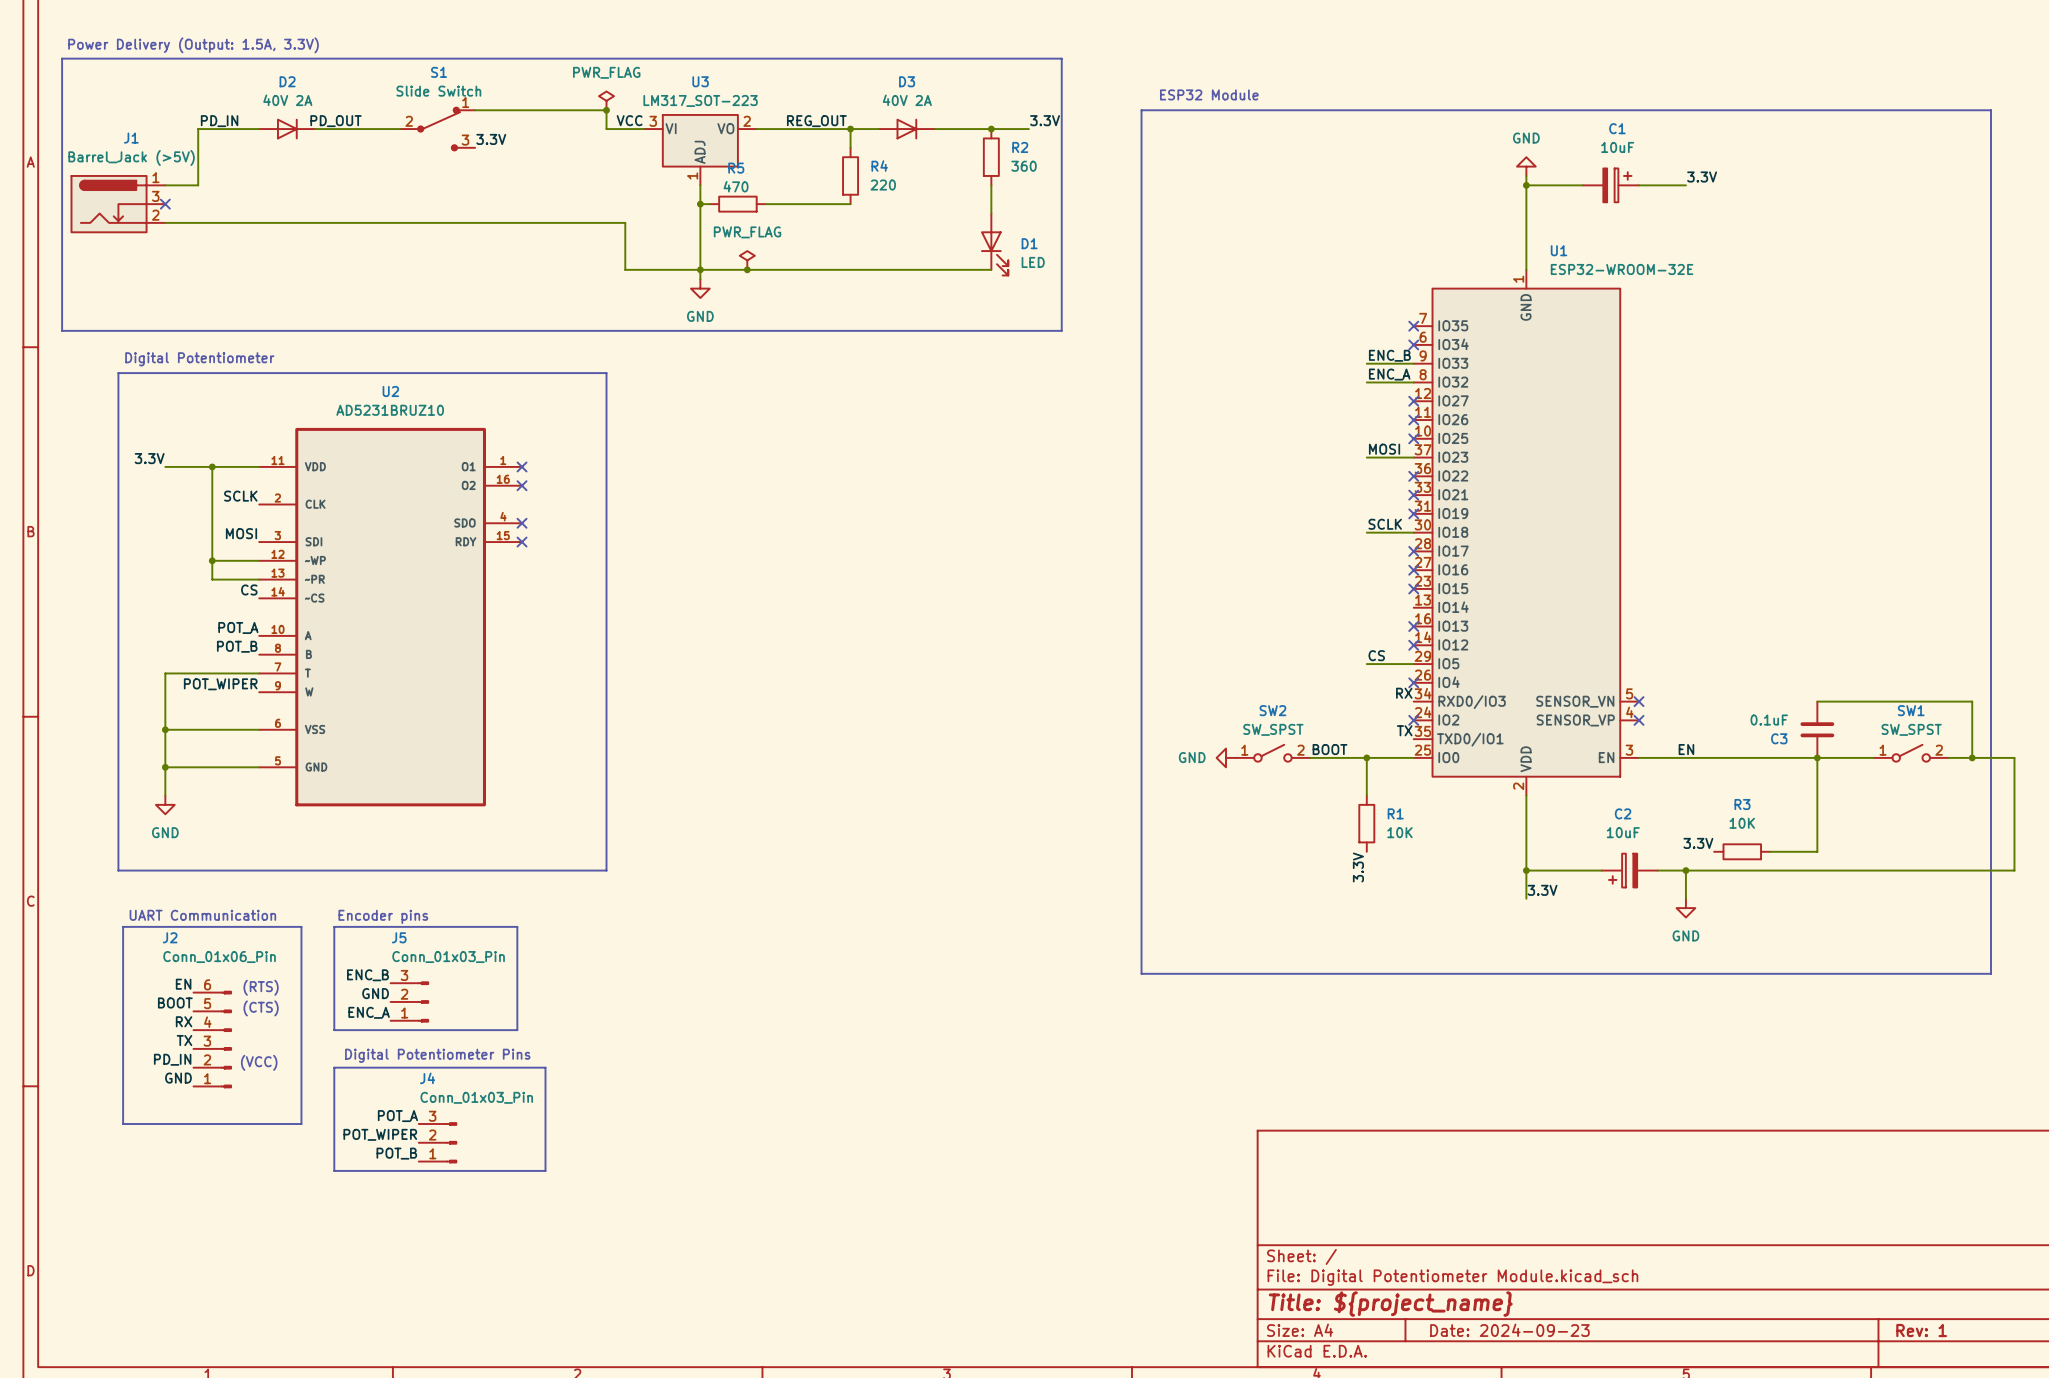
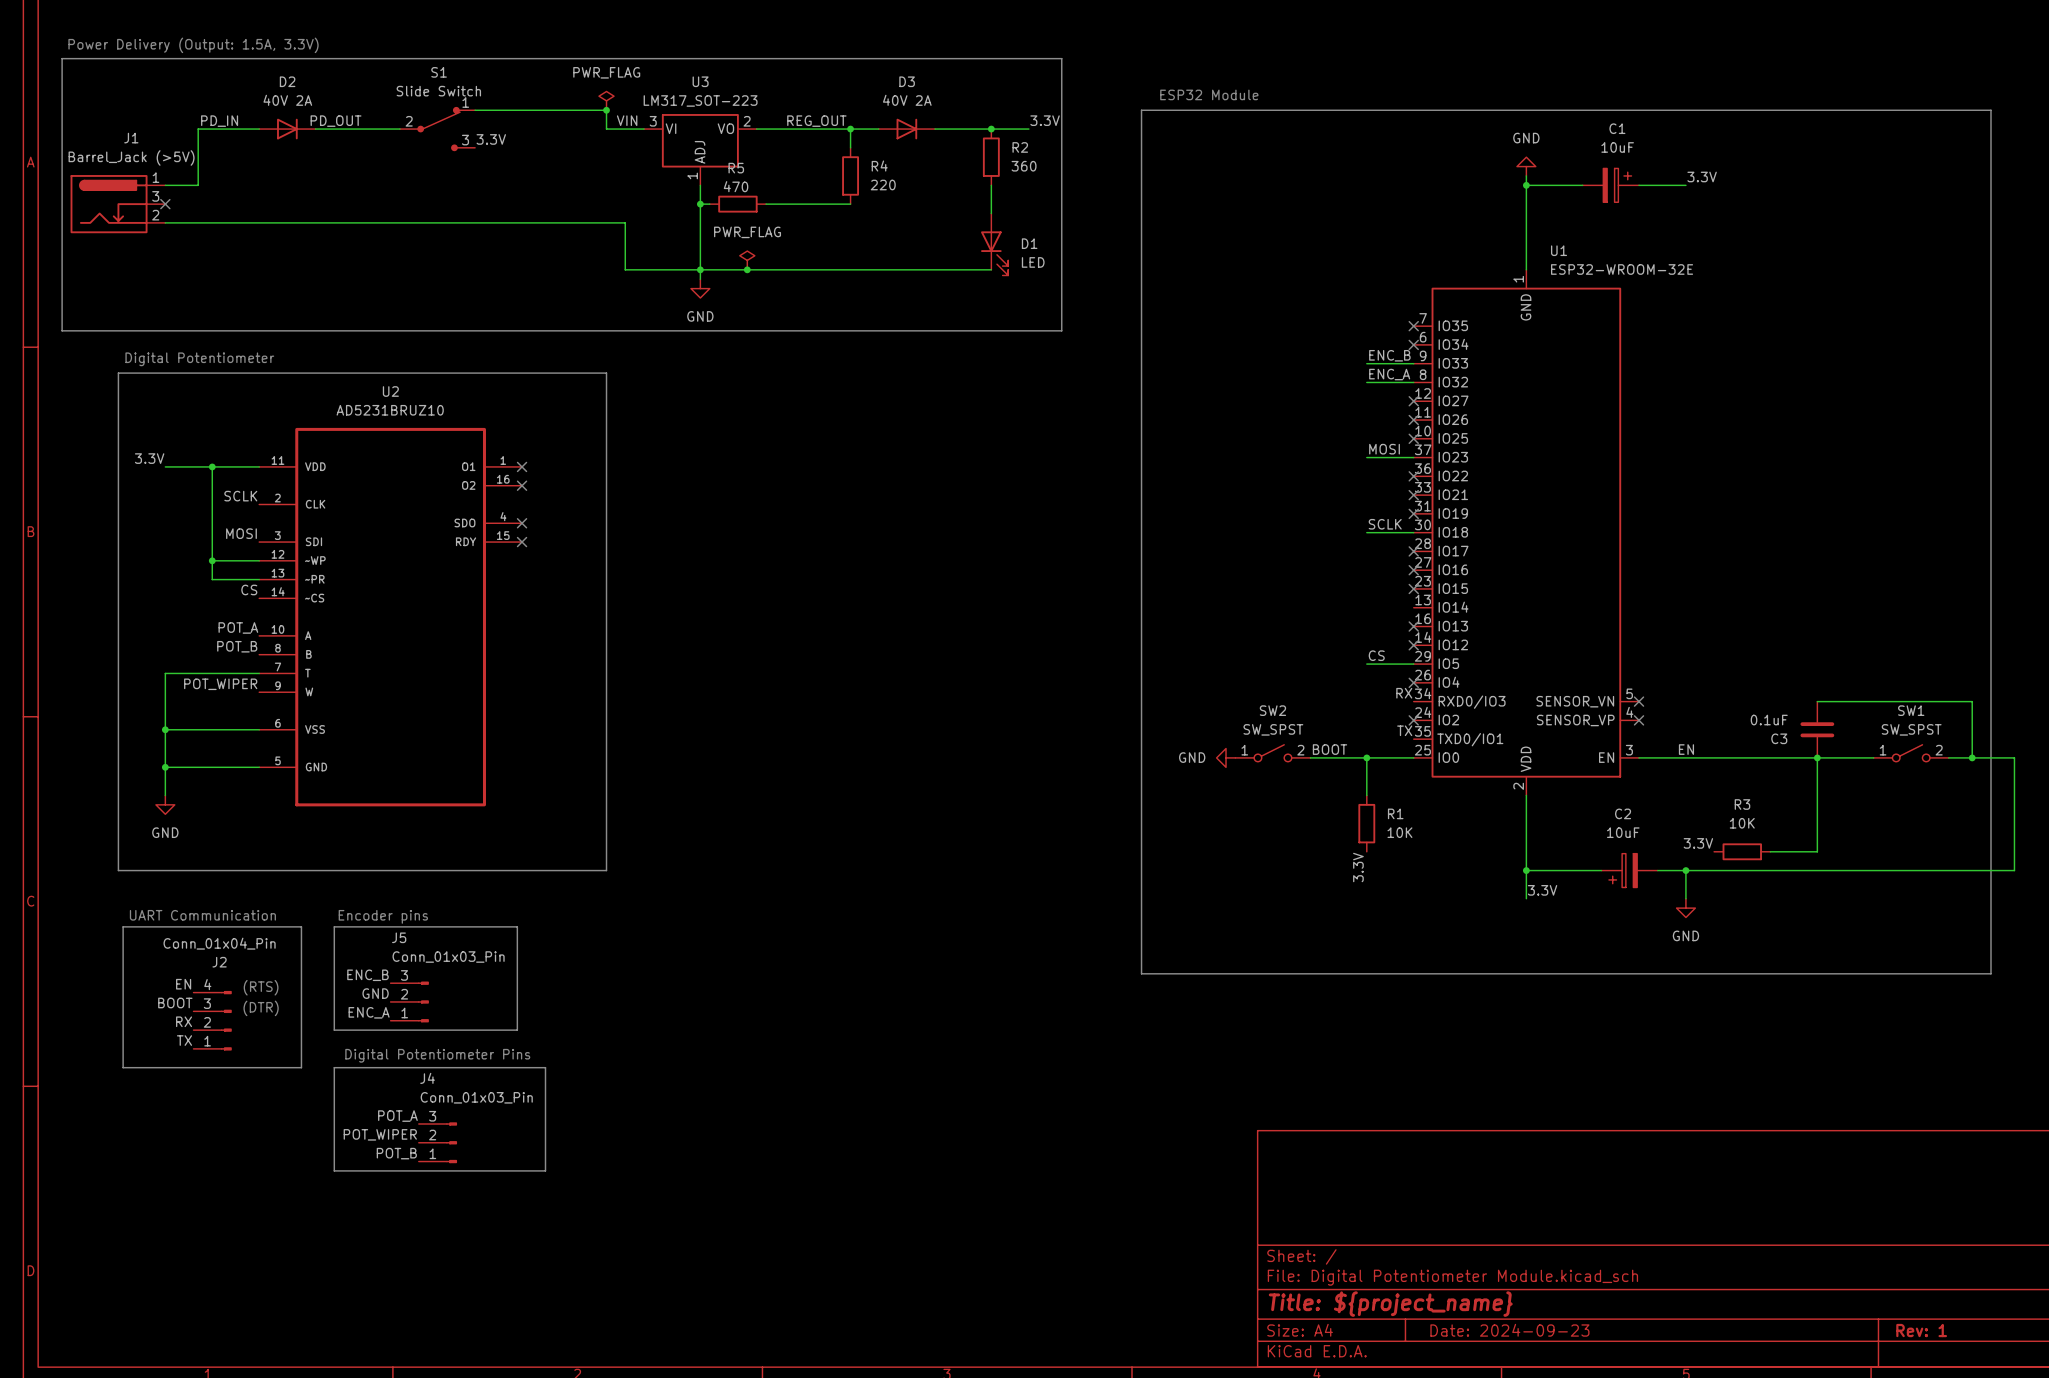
label: VCC (629, 120) -> VIN (627, 120)
J2 name position: J2 (170, 937) -> J2 (219, 962)
J2 value: Conn_01x06_Pin (219, 957) -> Conn_01x04_Pin (219, 943)
J2 symbol: [193, 991, 232, 1088] -> [193, 991, 232, 1051]
text: (CTS) (261, 1008) -> (DTR) (261, 1008)
label: PD_IN (172, 1059) -> none
text: (VCC) (259, 1062) -> none
line: (123, 1067) (123, 1124) (301, 1124) (301, 1067) -> (123, 1067) (301, 1067)
label: GND (178, 1078) -> none

